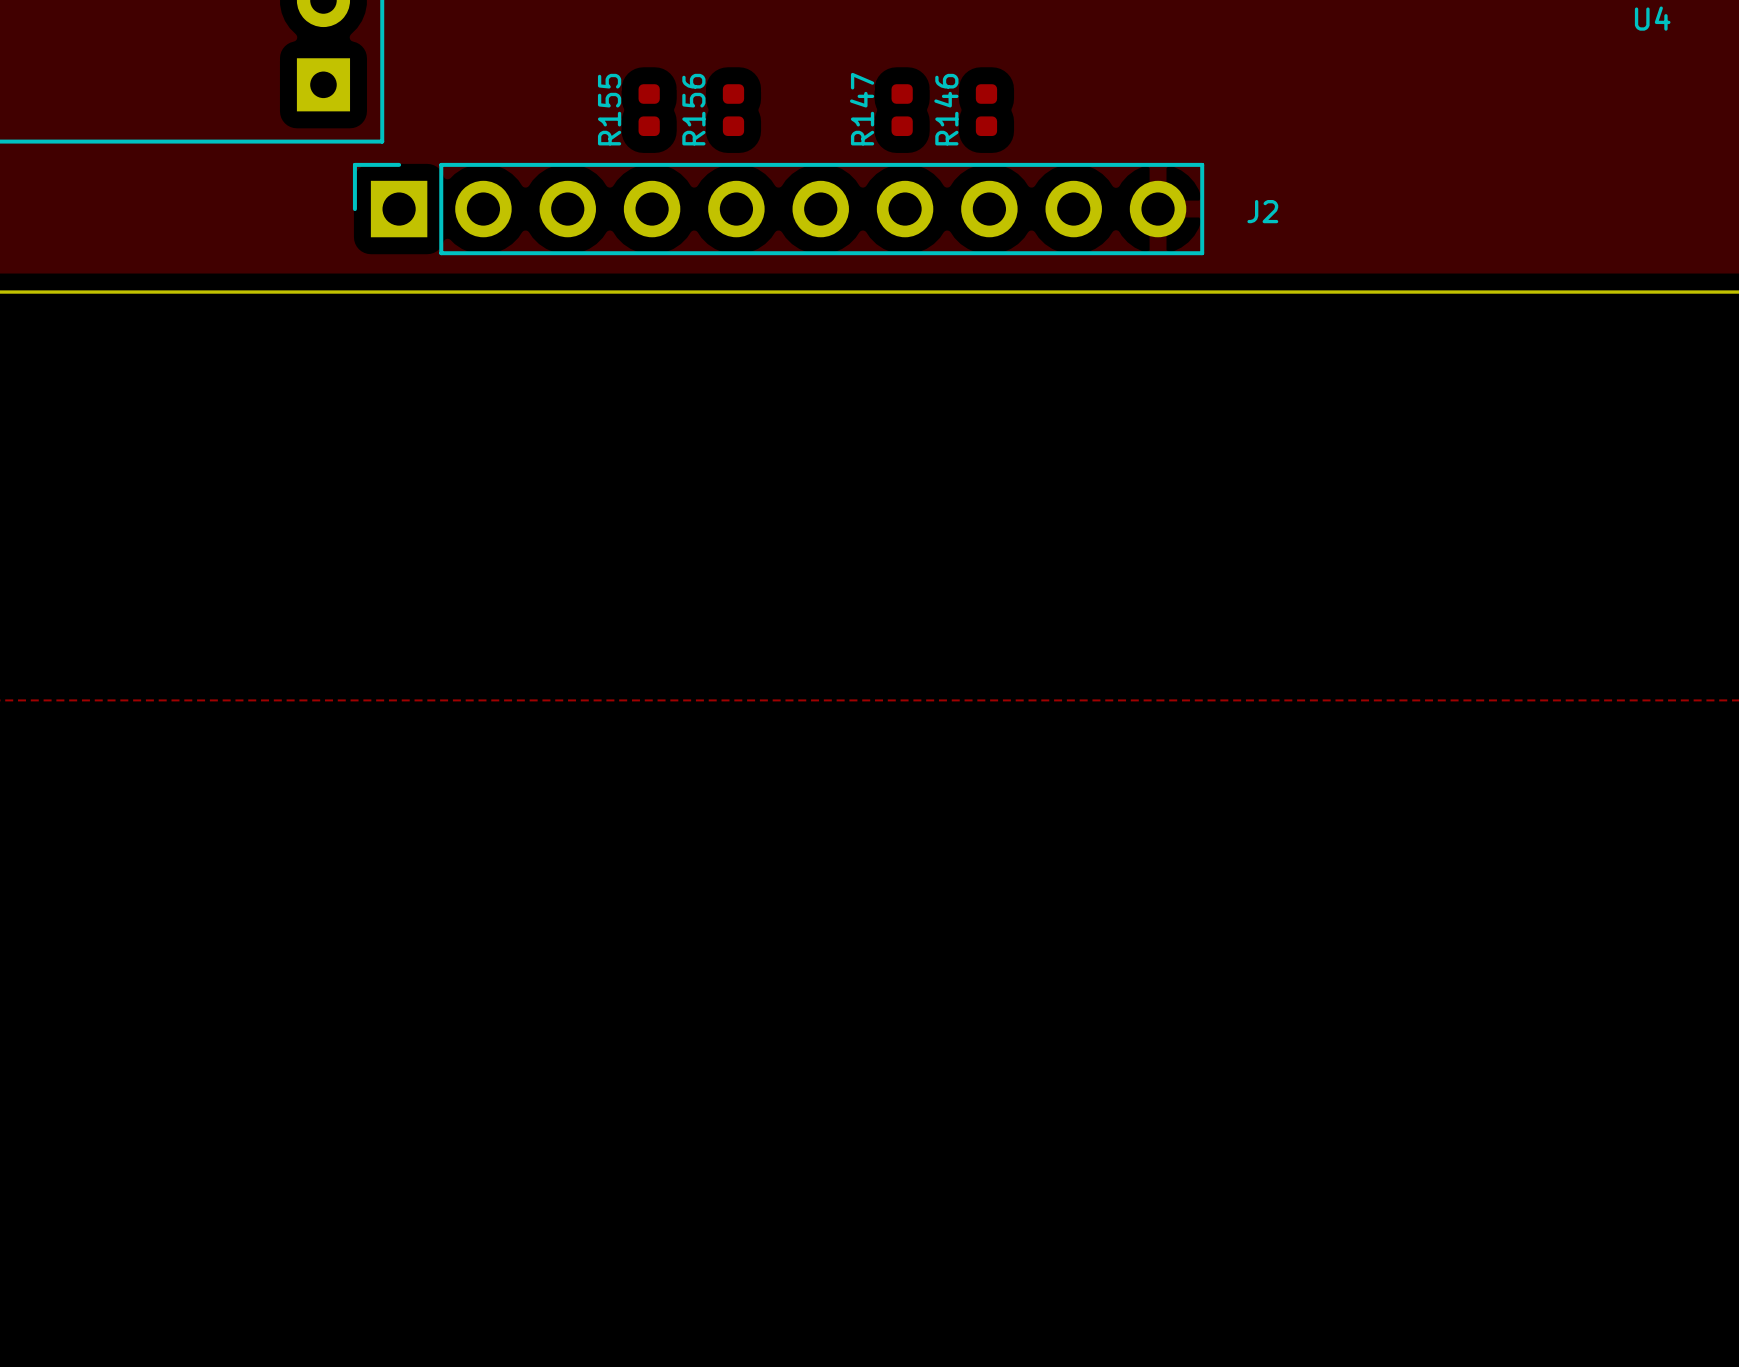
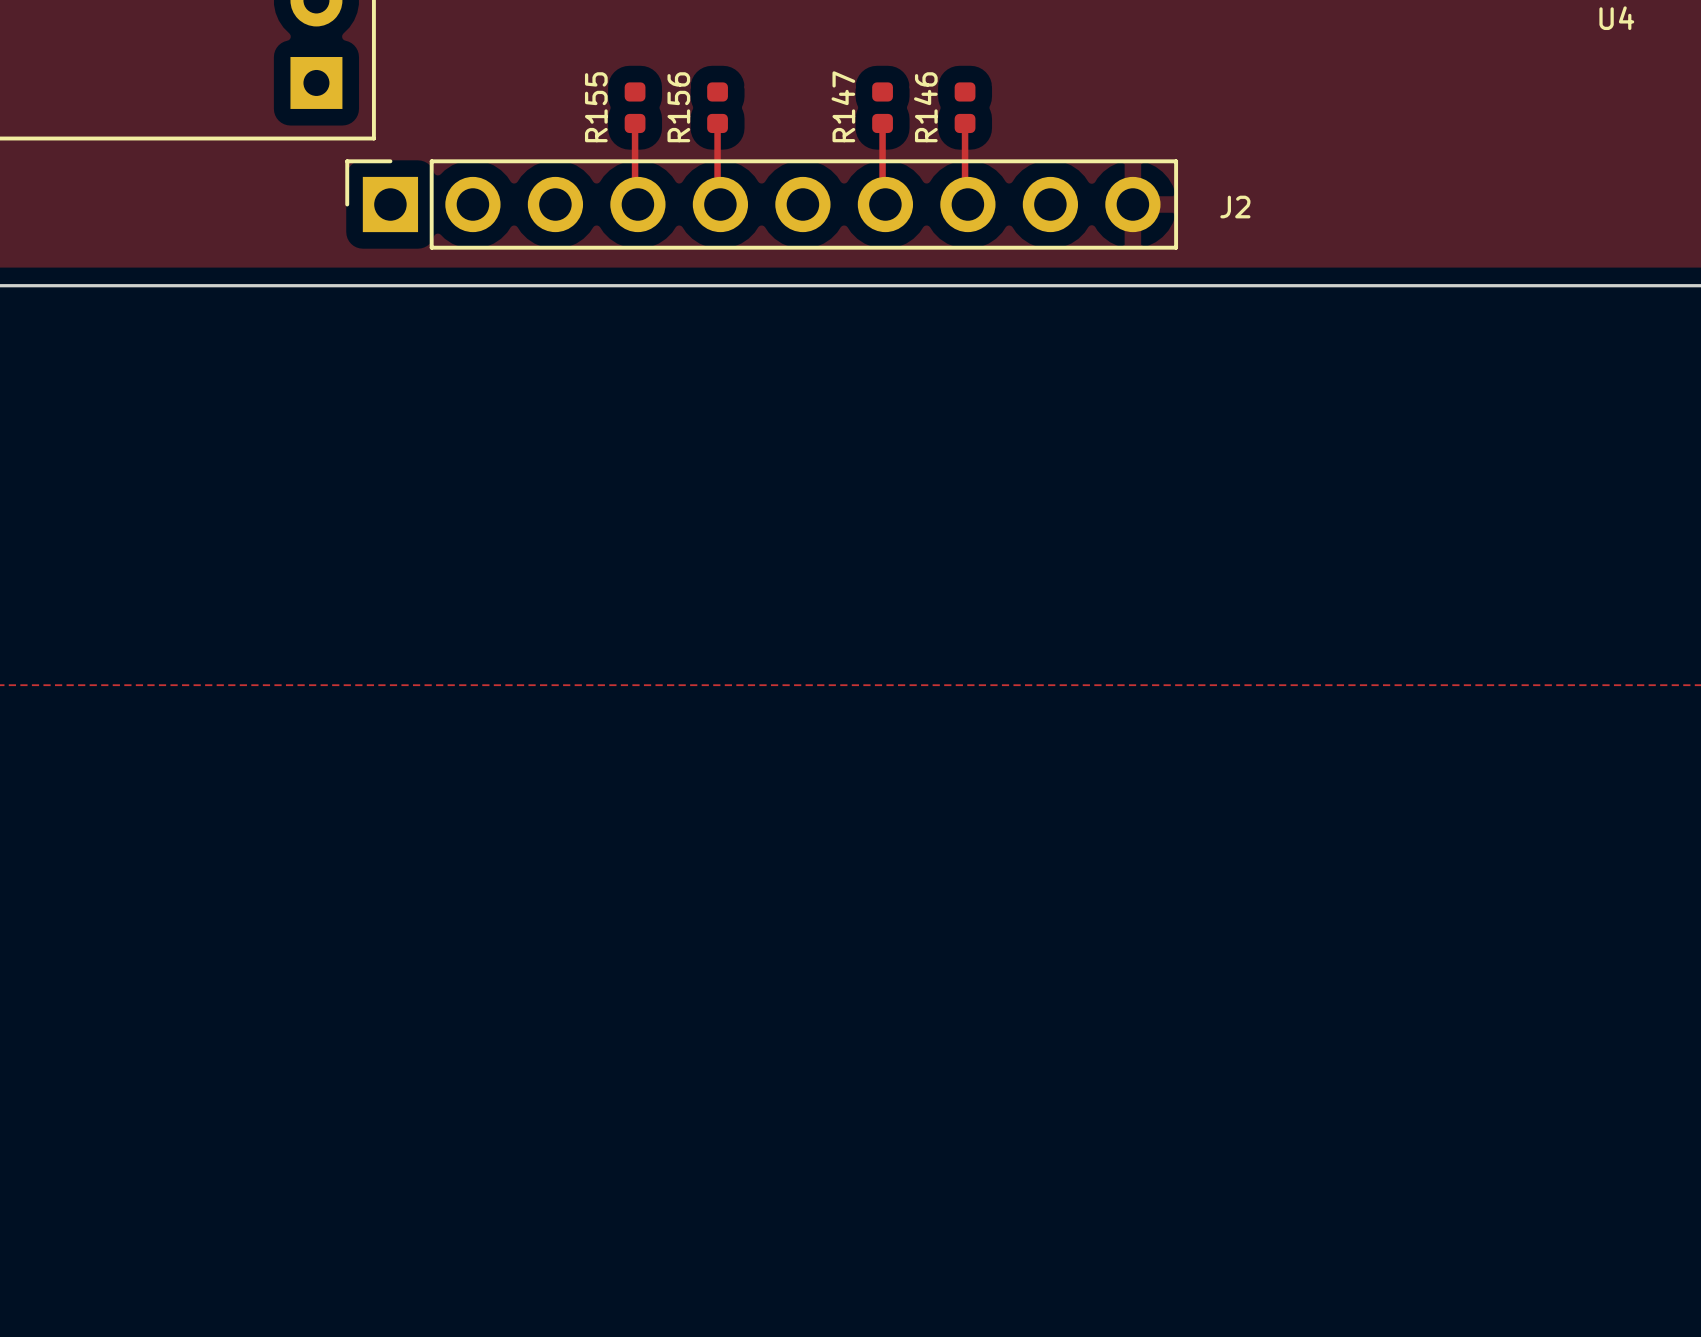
top track: none -> (635, 123) (635, 201) (637, 204)
top track: none -> (717, 123) (717, 201) (720, 204)
top track: none -> (882, 123) (882, 201) (885, 204)
top track: none -> (965, 123) (965, 201) (967, 204)

